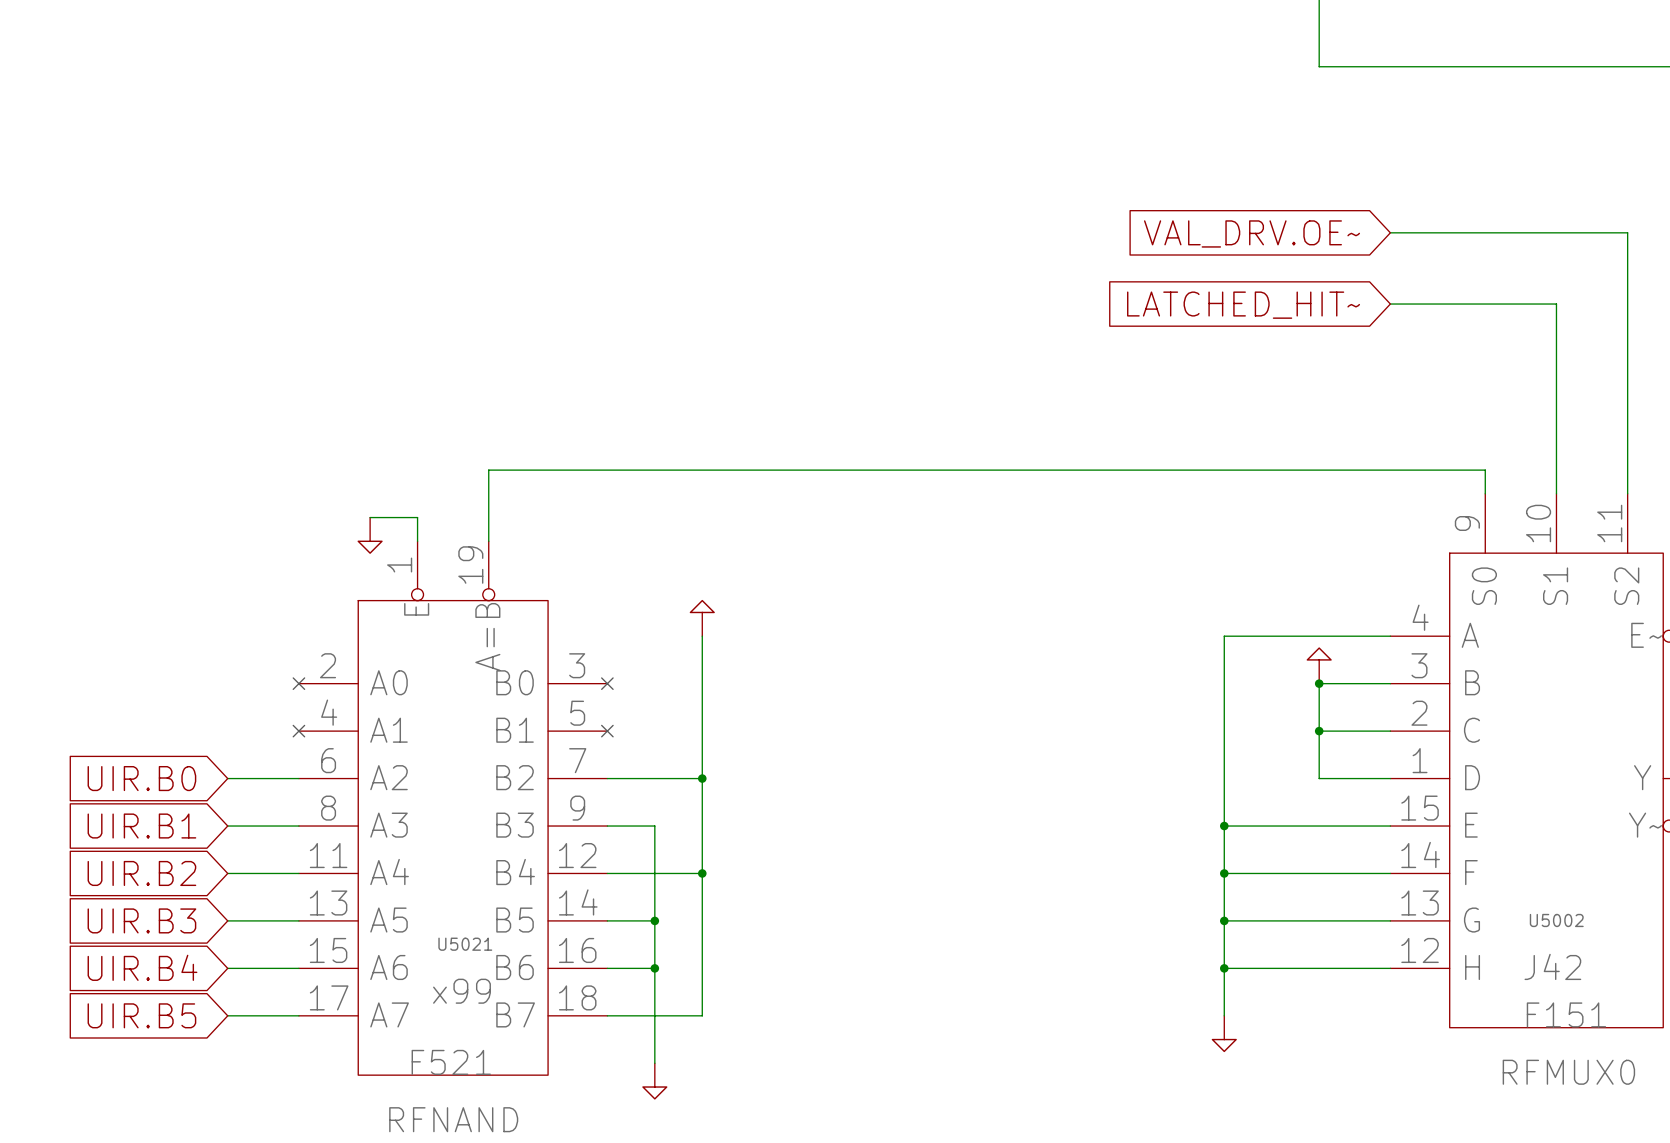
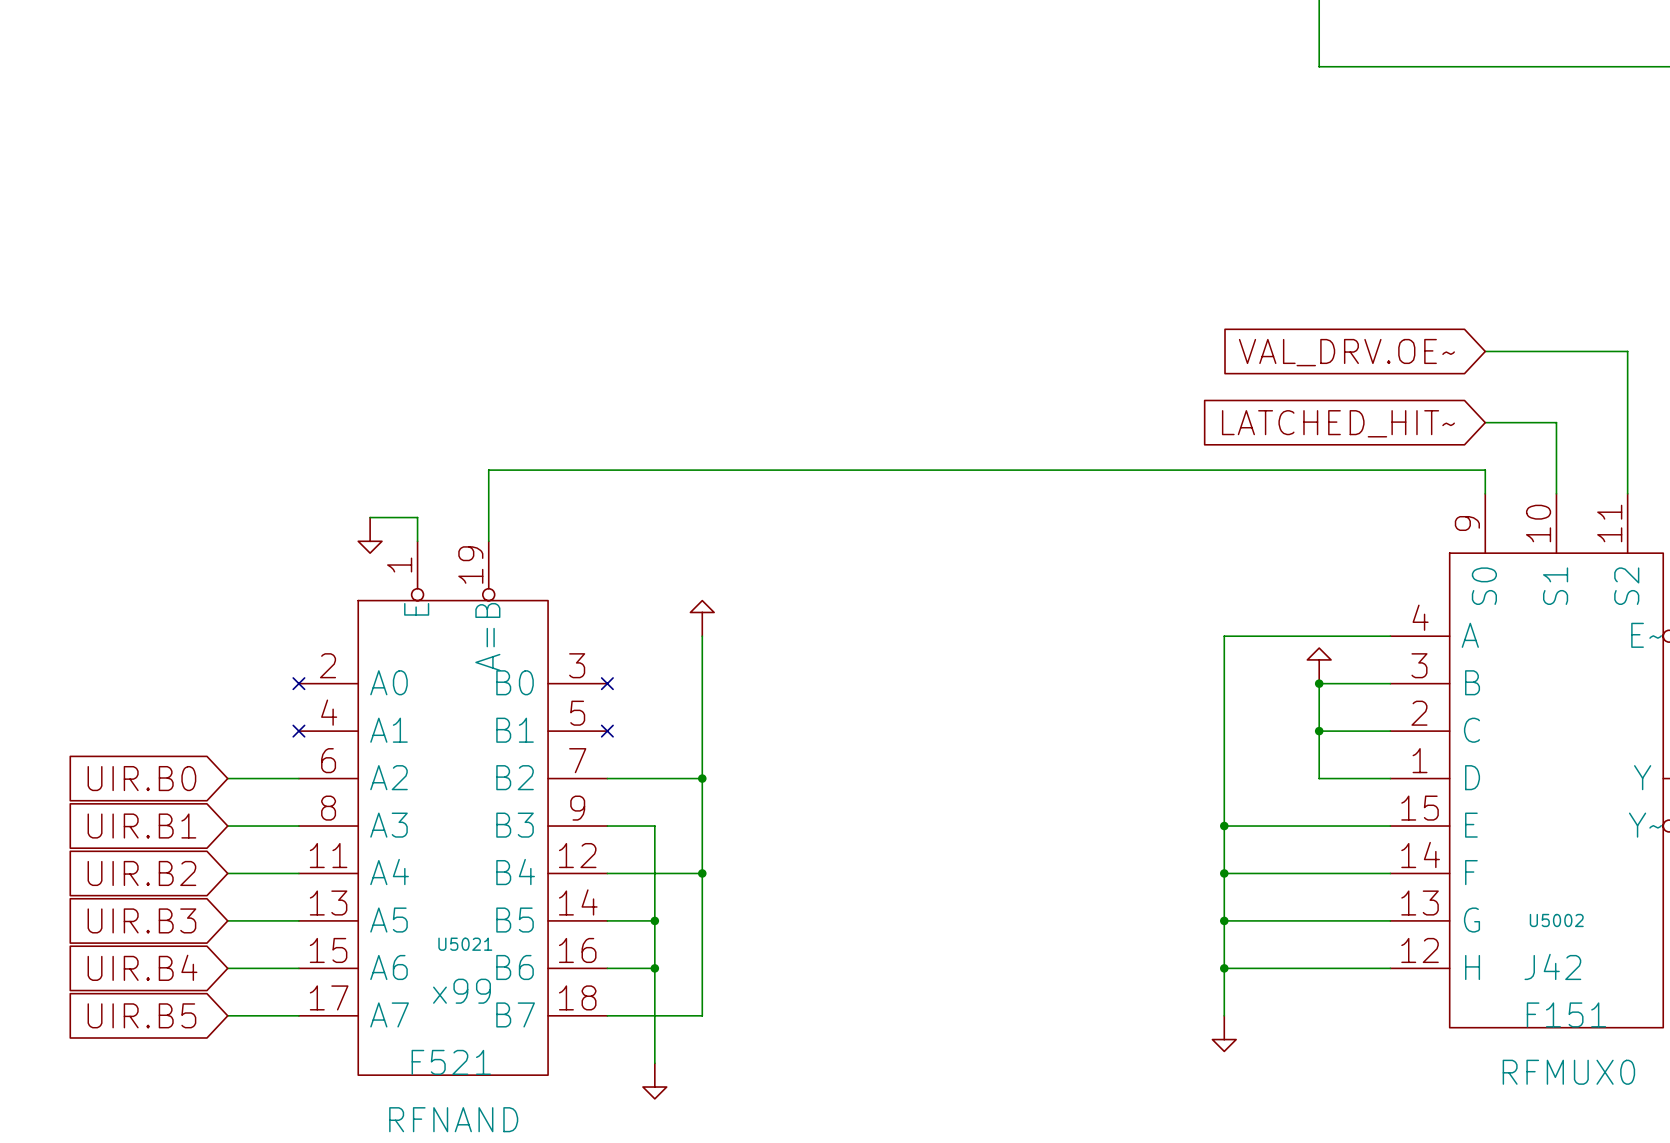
wire: (1390, 232) (1627, 232) (1627, 351) -> (1485, 351) (1627, 351)
global label position: VAL_DRV.OE~ (1252, 233) -> VAL_DRV.OE~ (1346, 352)
wire: (1390, 304) (1556, 304) (1556, 422) -> (1485, 422) (1556, 422)
global label position: LATCHED_HIT~ (1243, 305) -> LATCHED_HIT~ (1338, 423)

